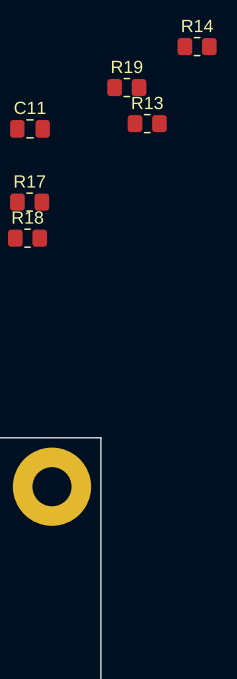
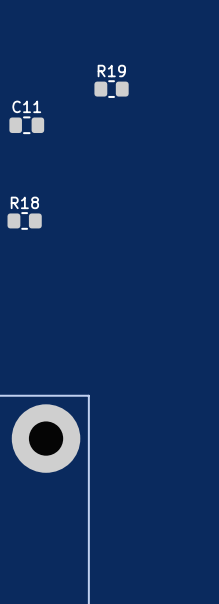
R14: (197, 46) -> none
R13: (147, 123) -> none
R17: (29, 202) -> none

